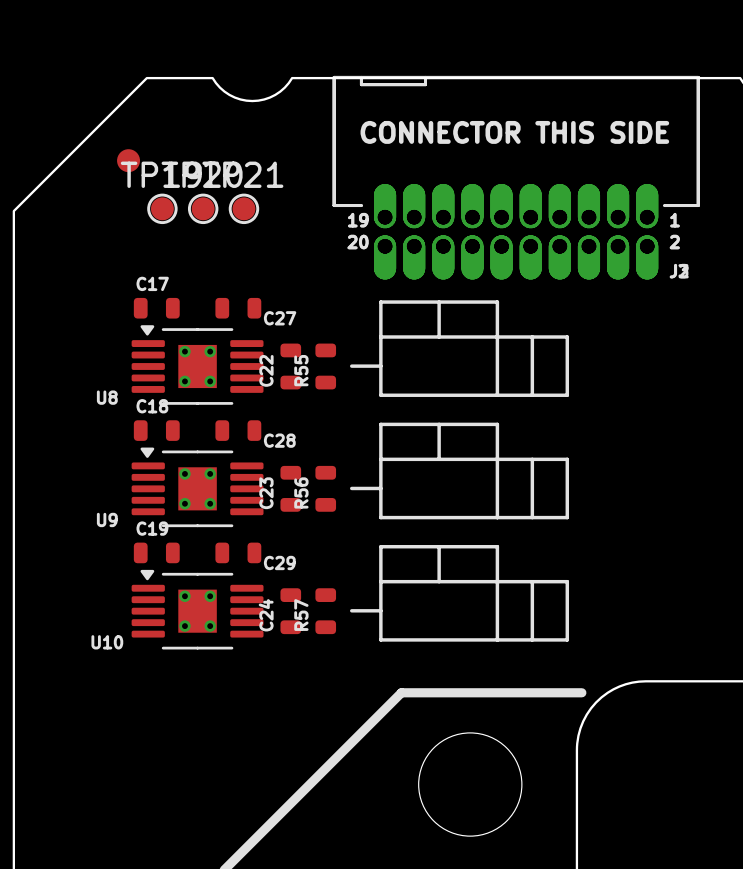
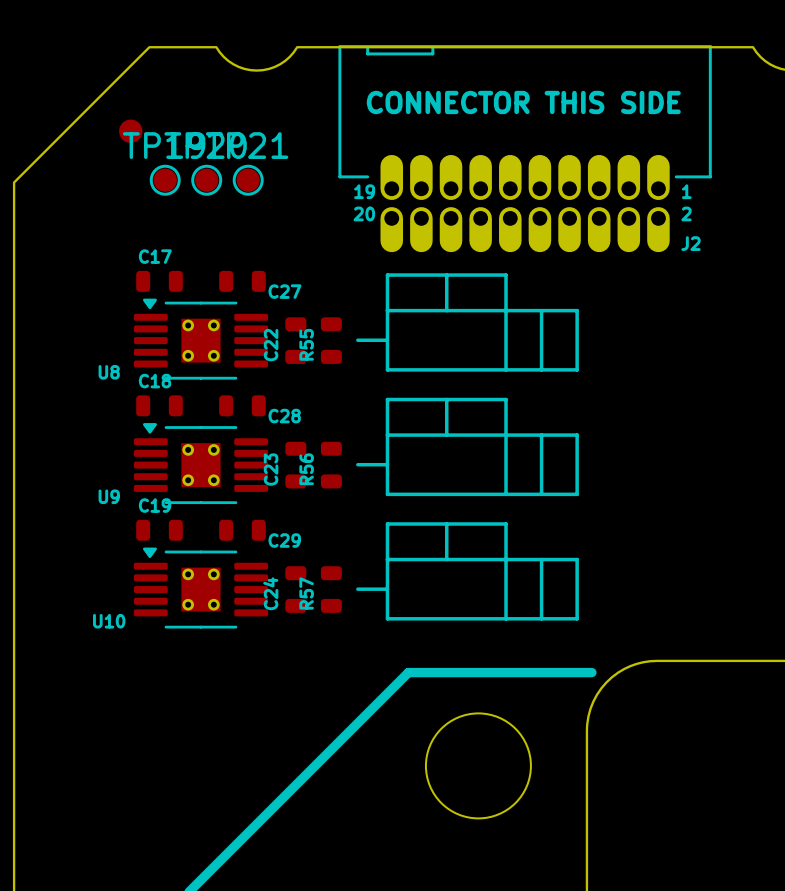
part: (516, 177) -> none

